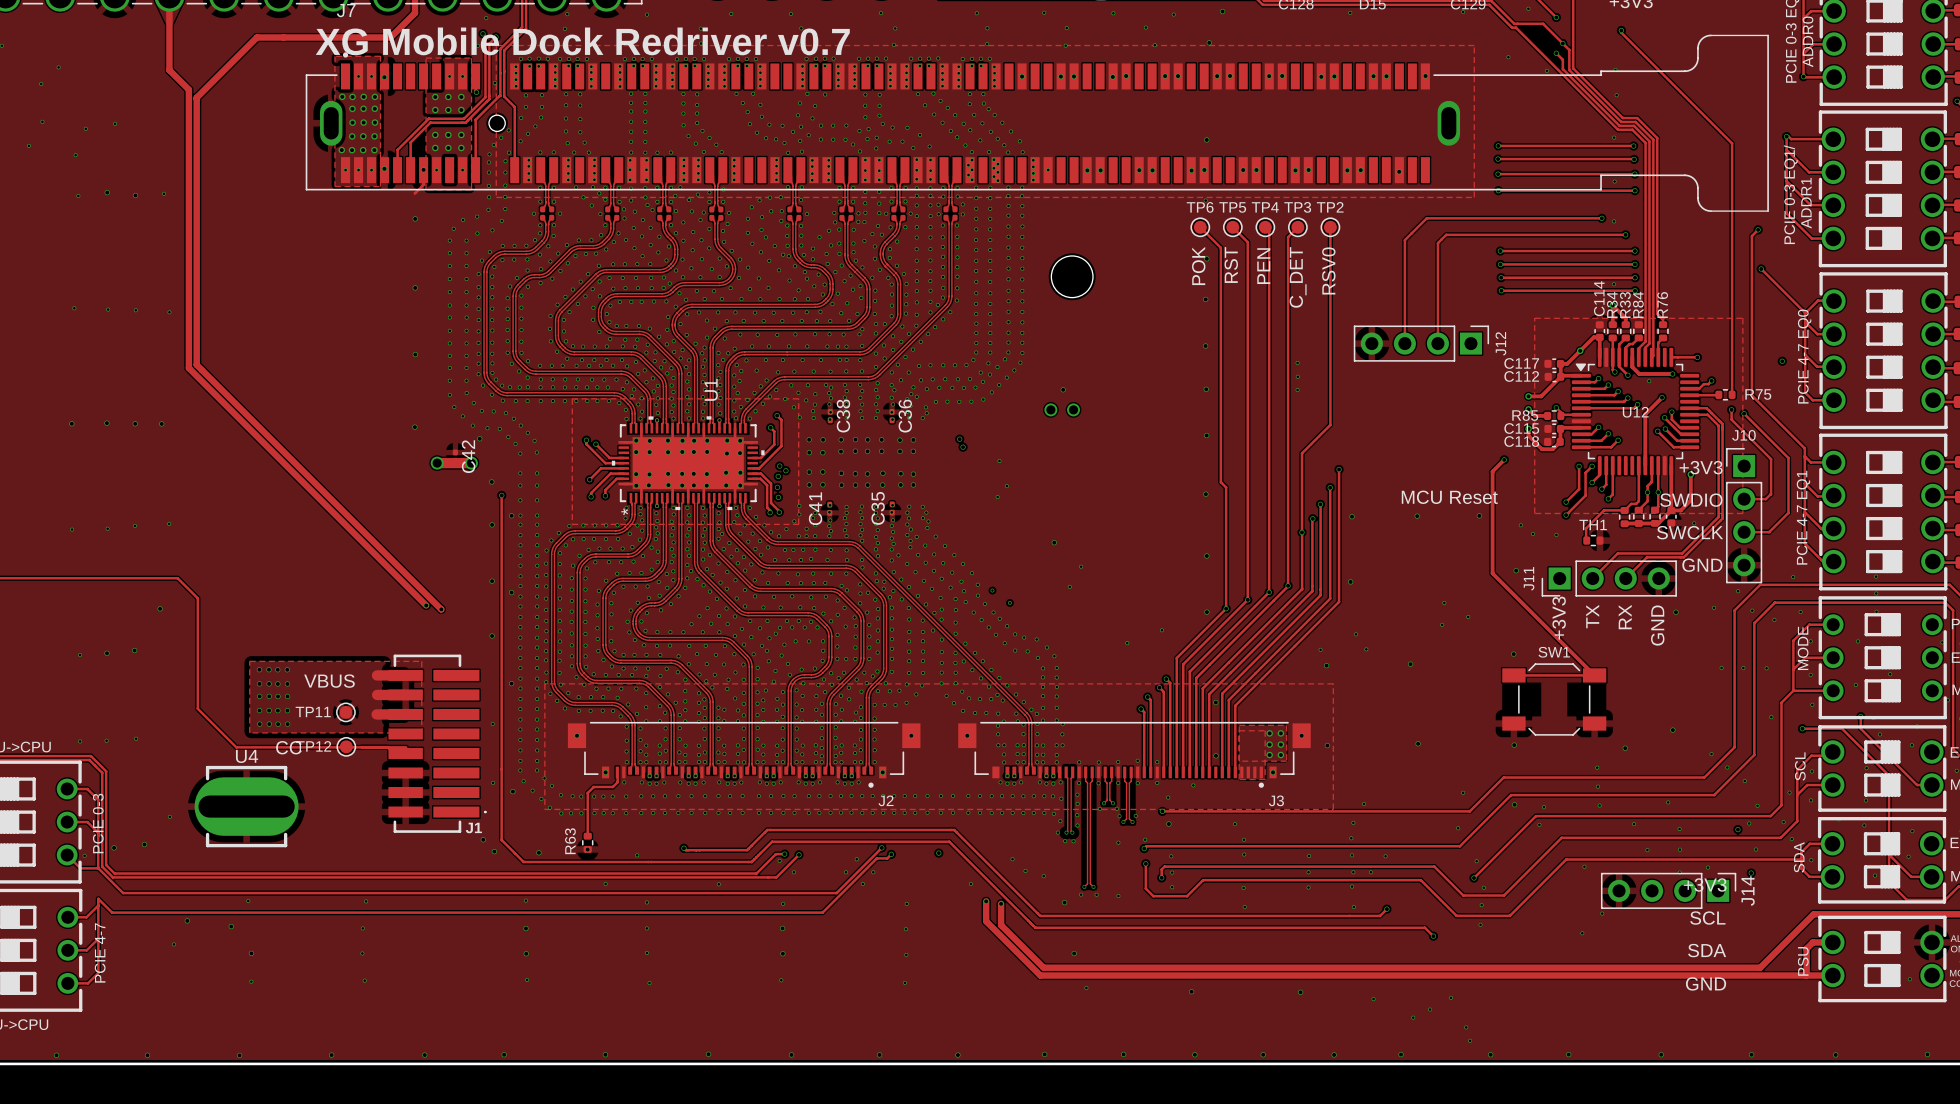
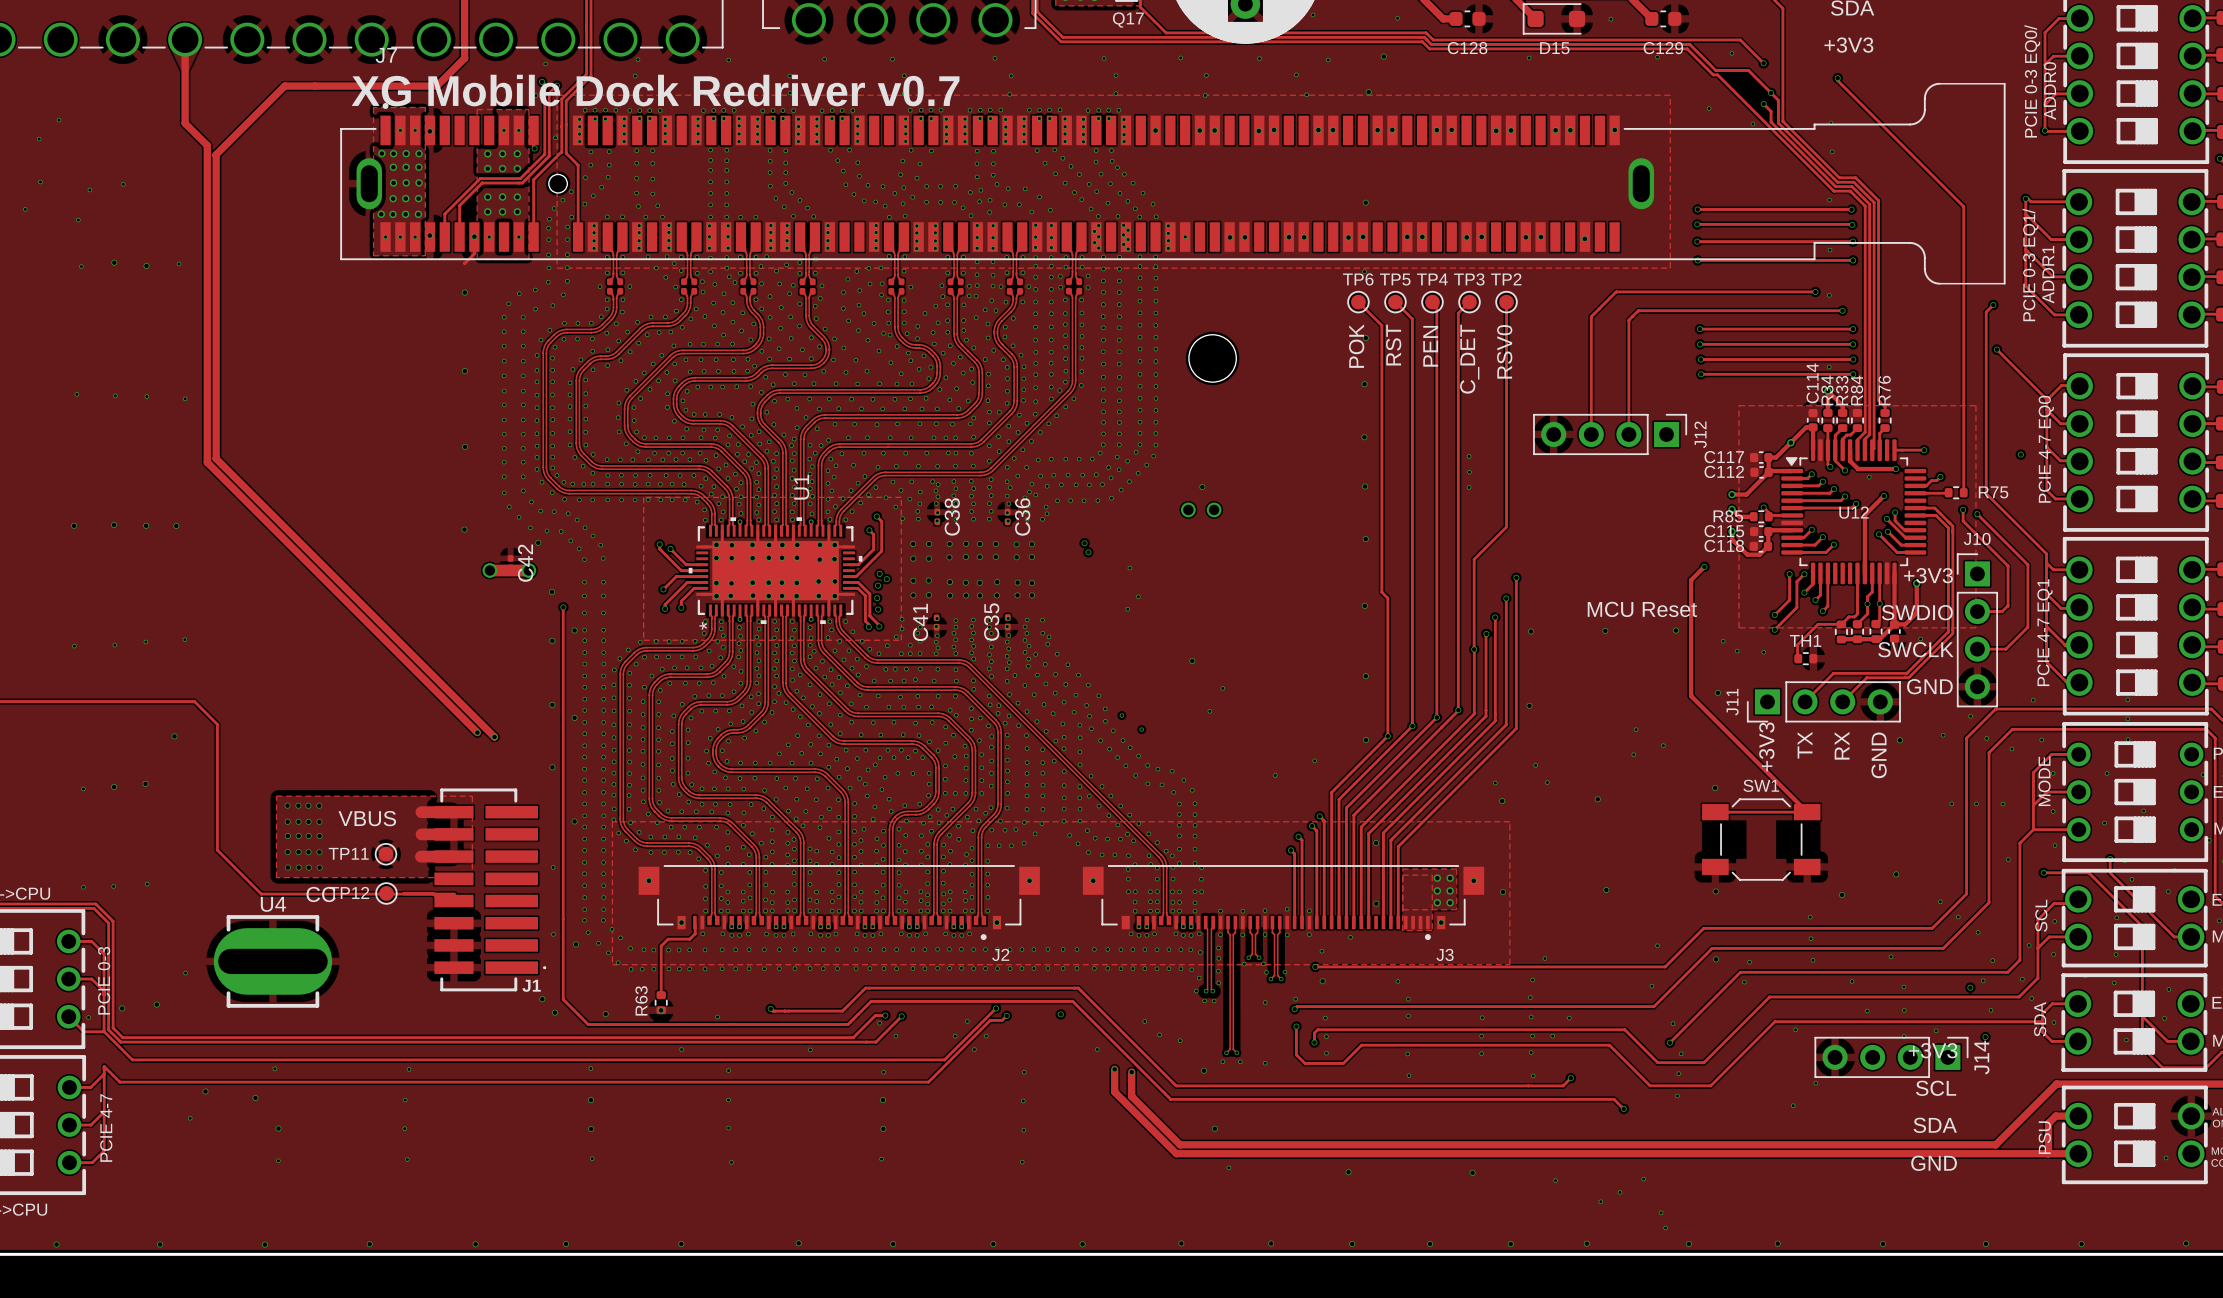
via: (926, 512) -> none

